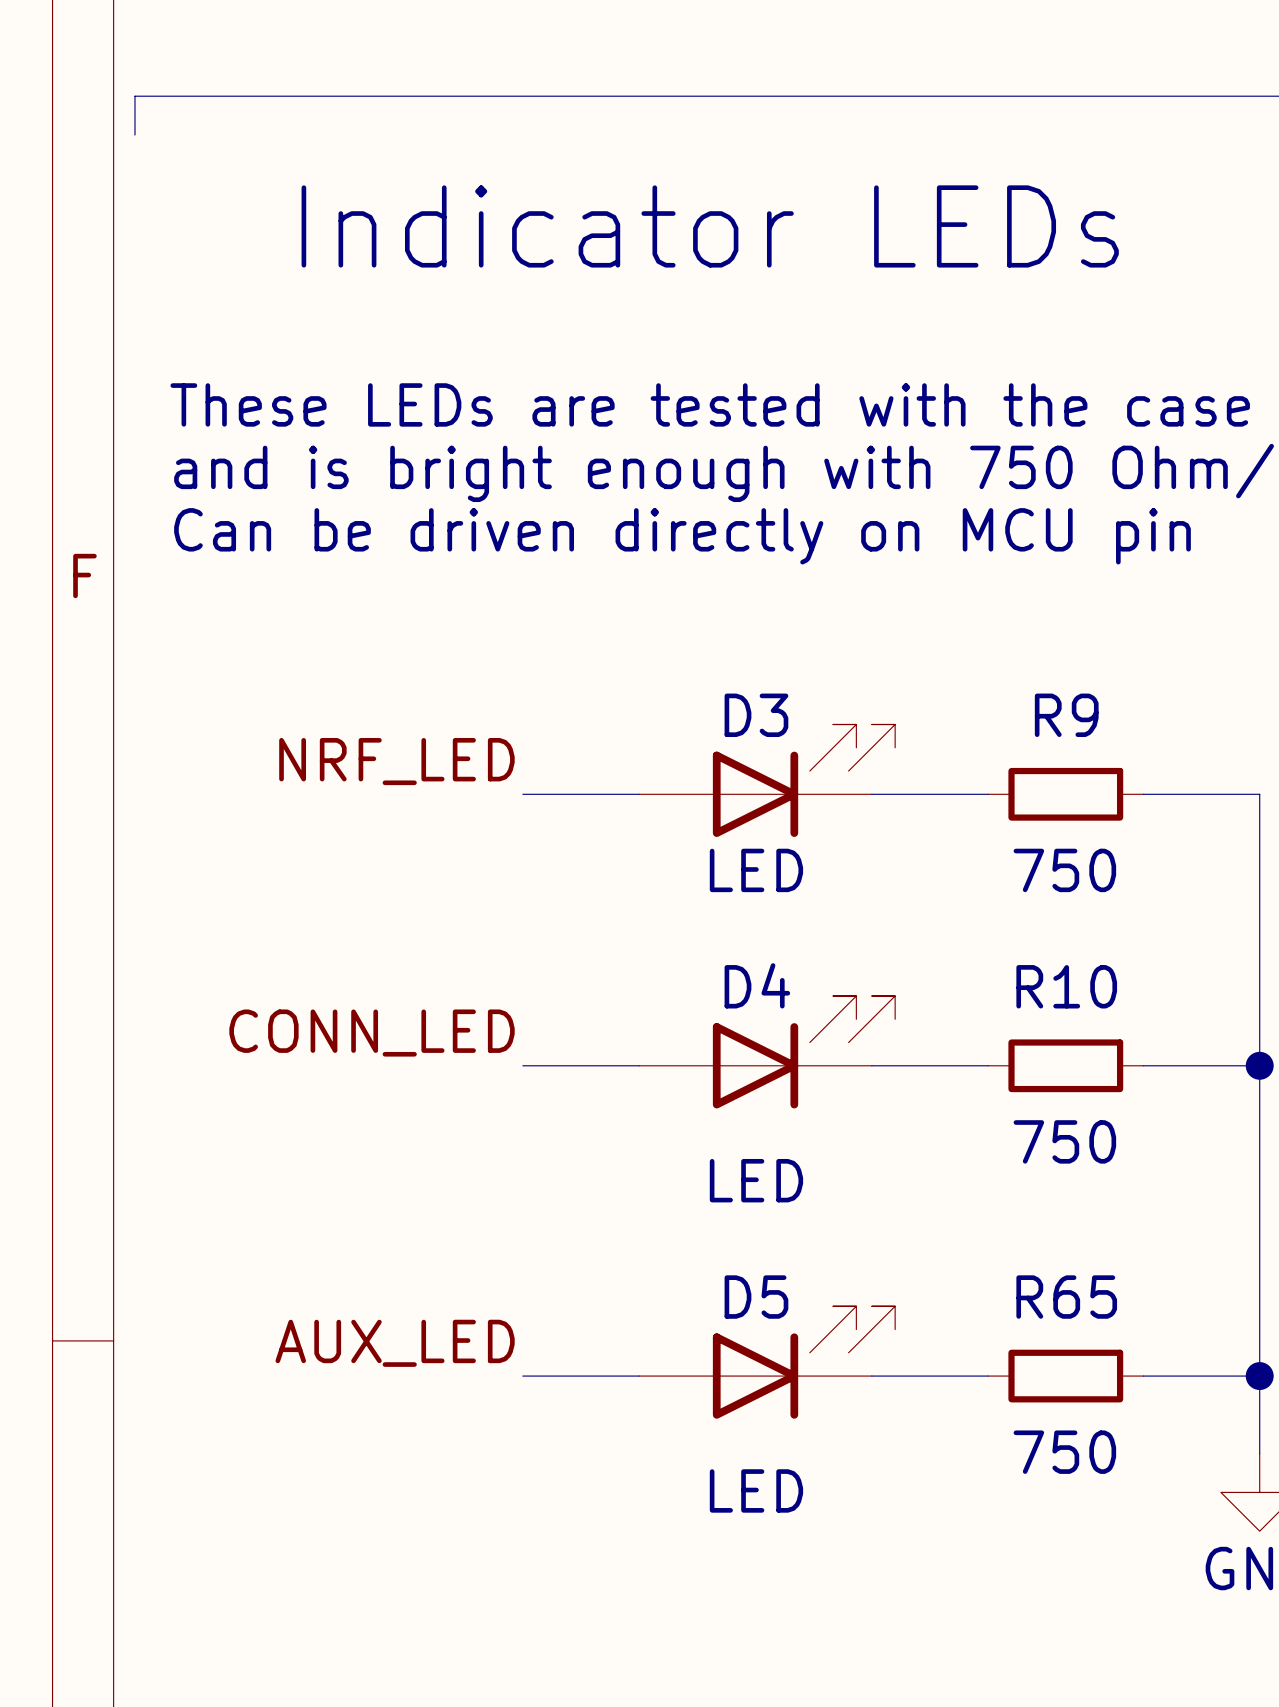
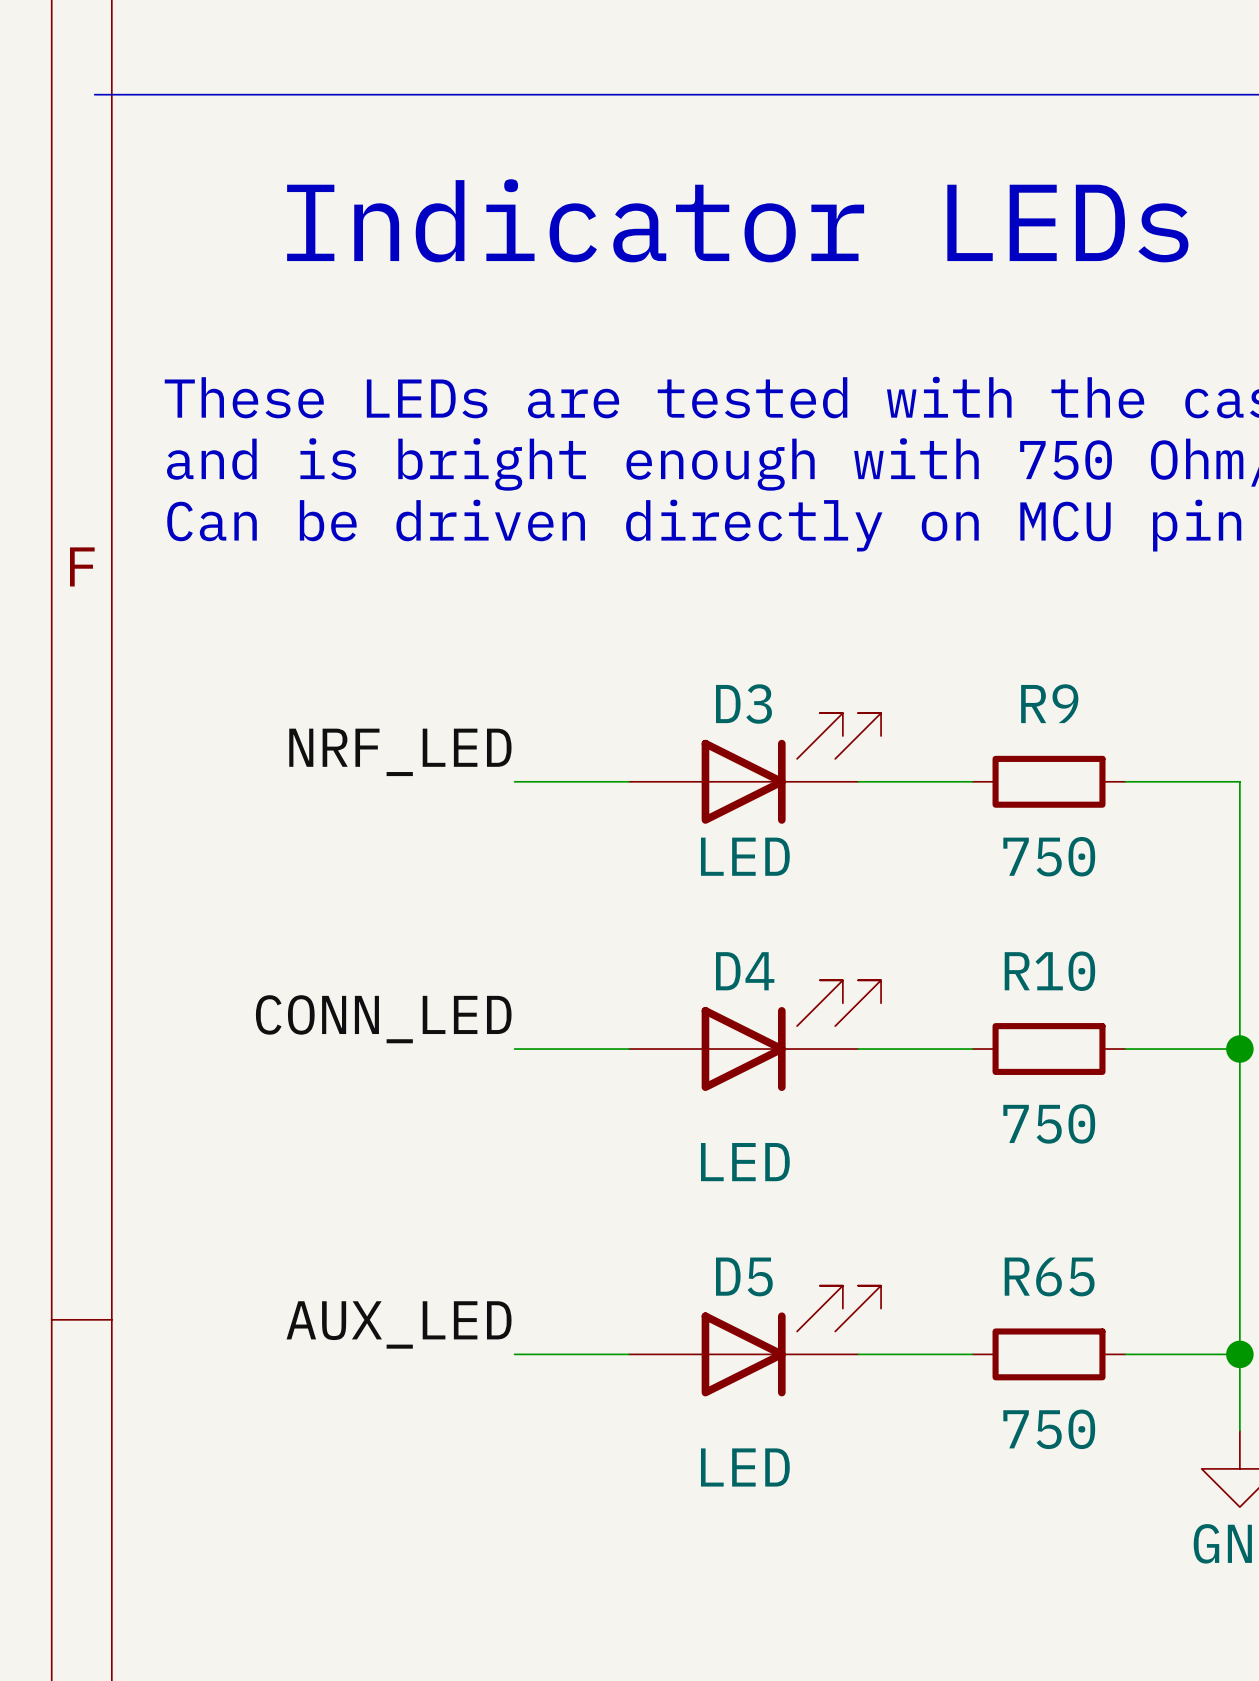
line: (134, 96) (134, 134) -> (132, 94) (94, 94)

